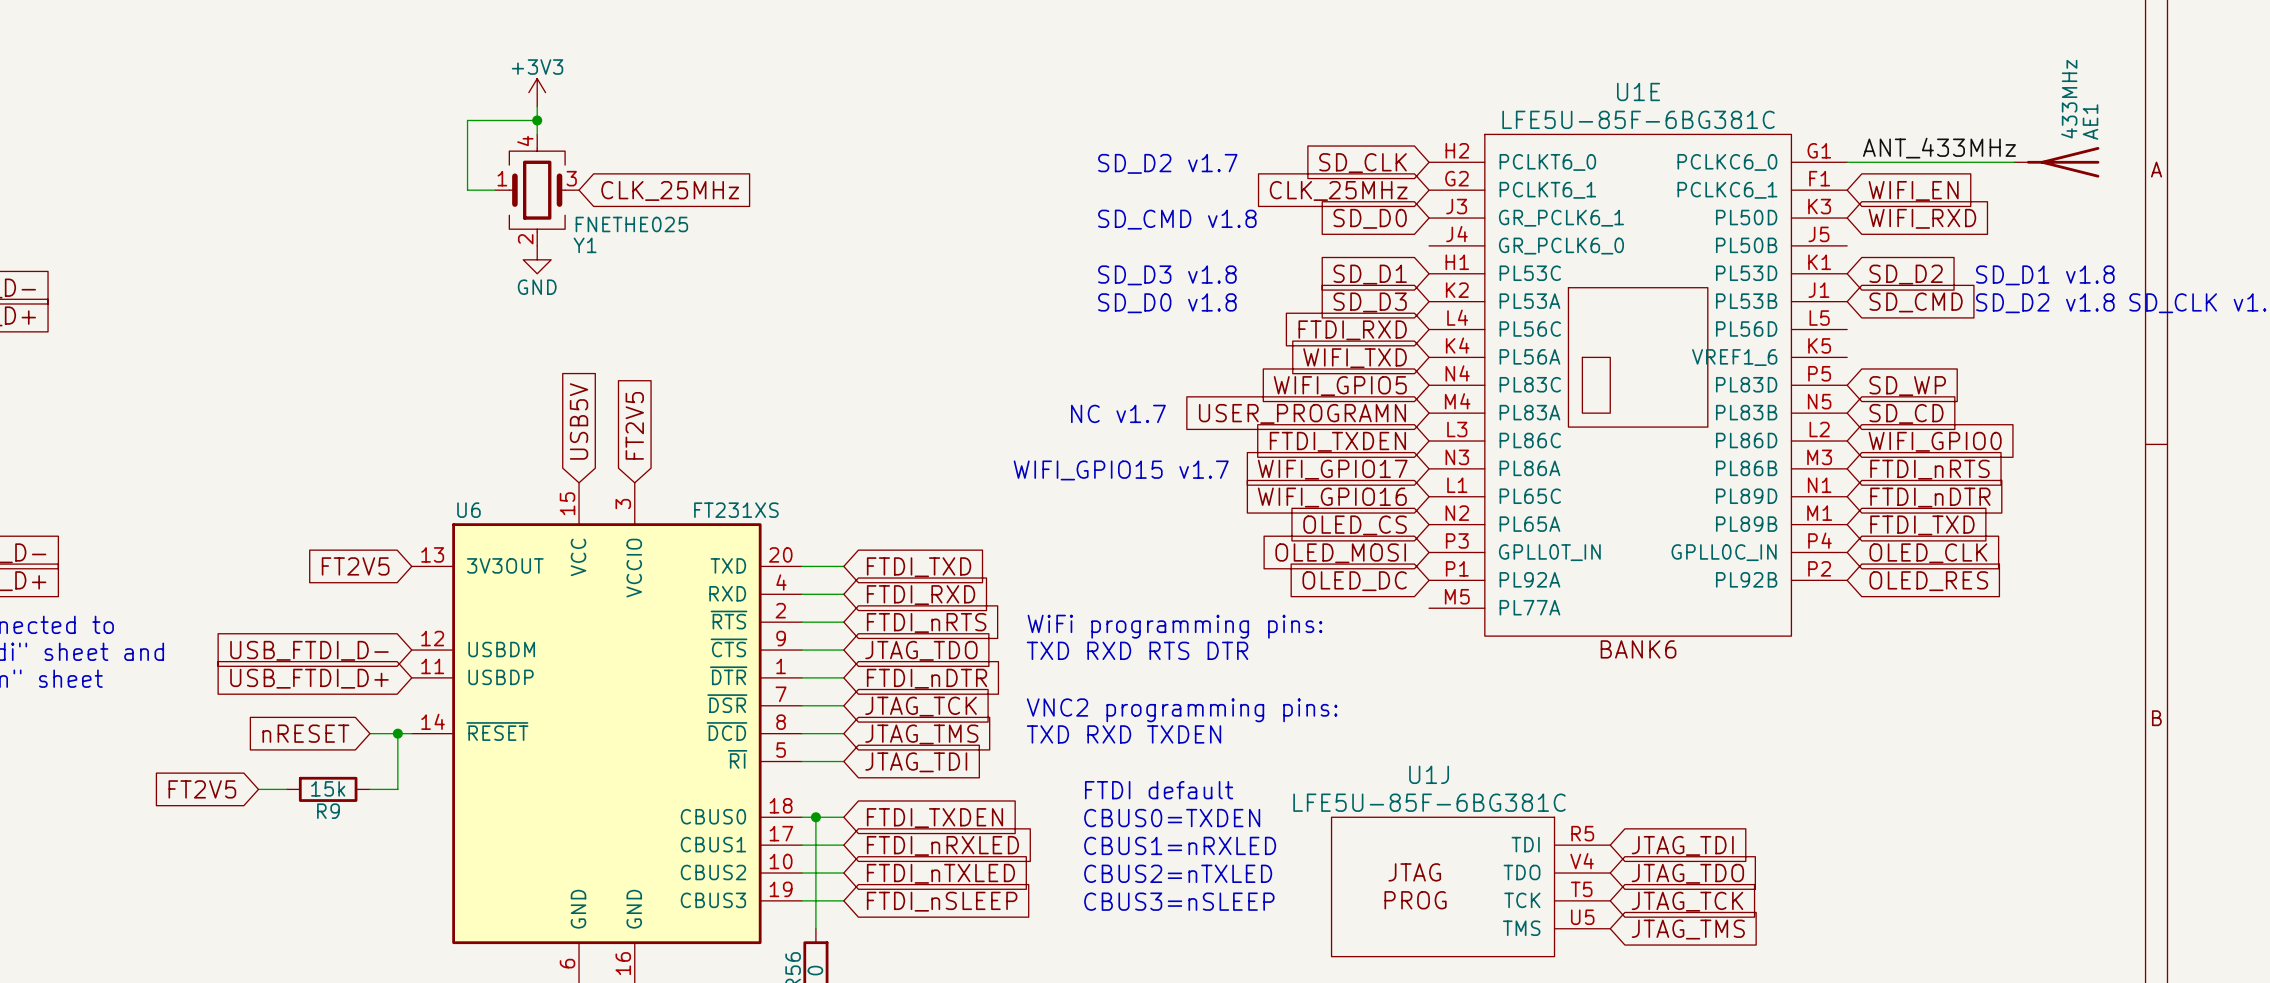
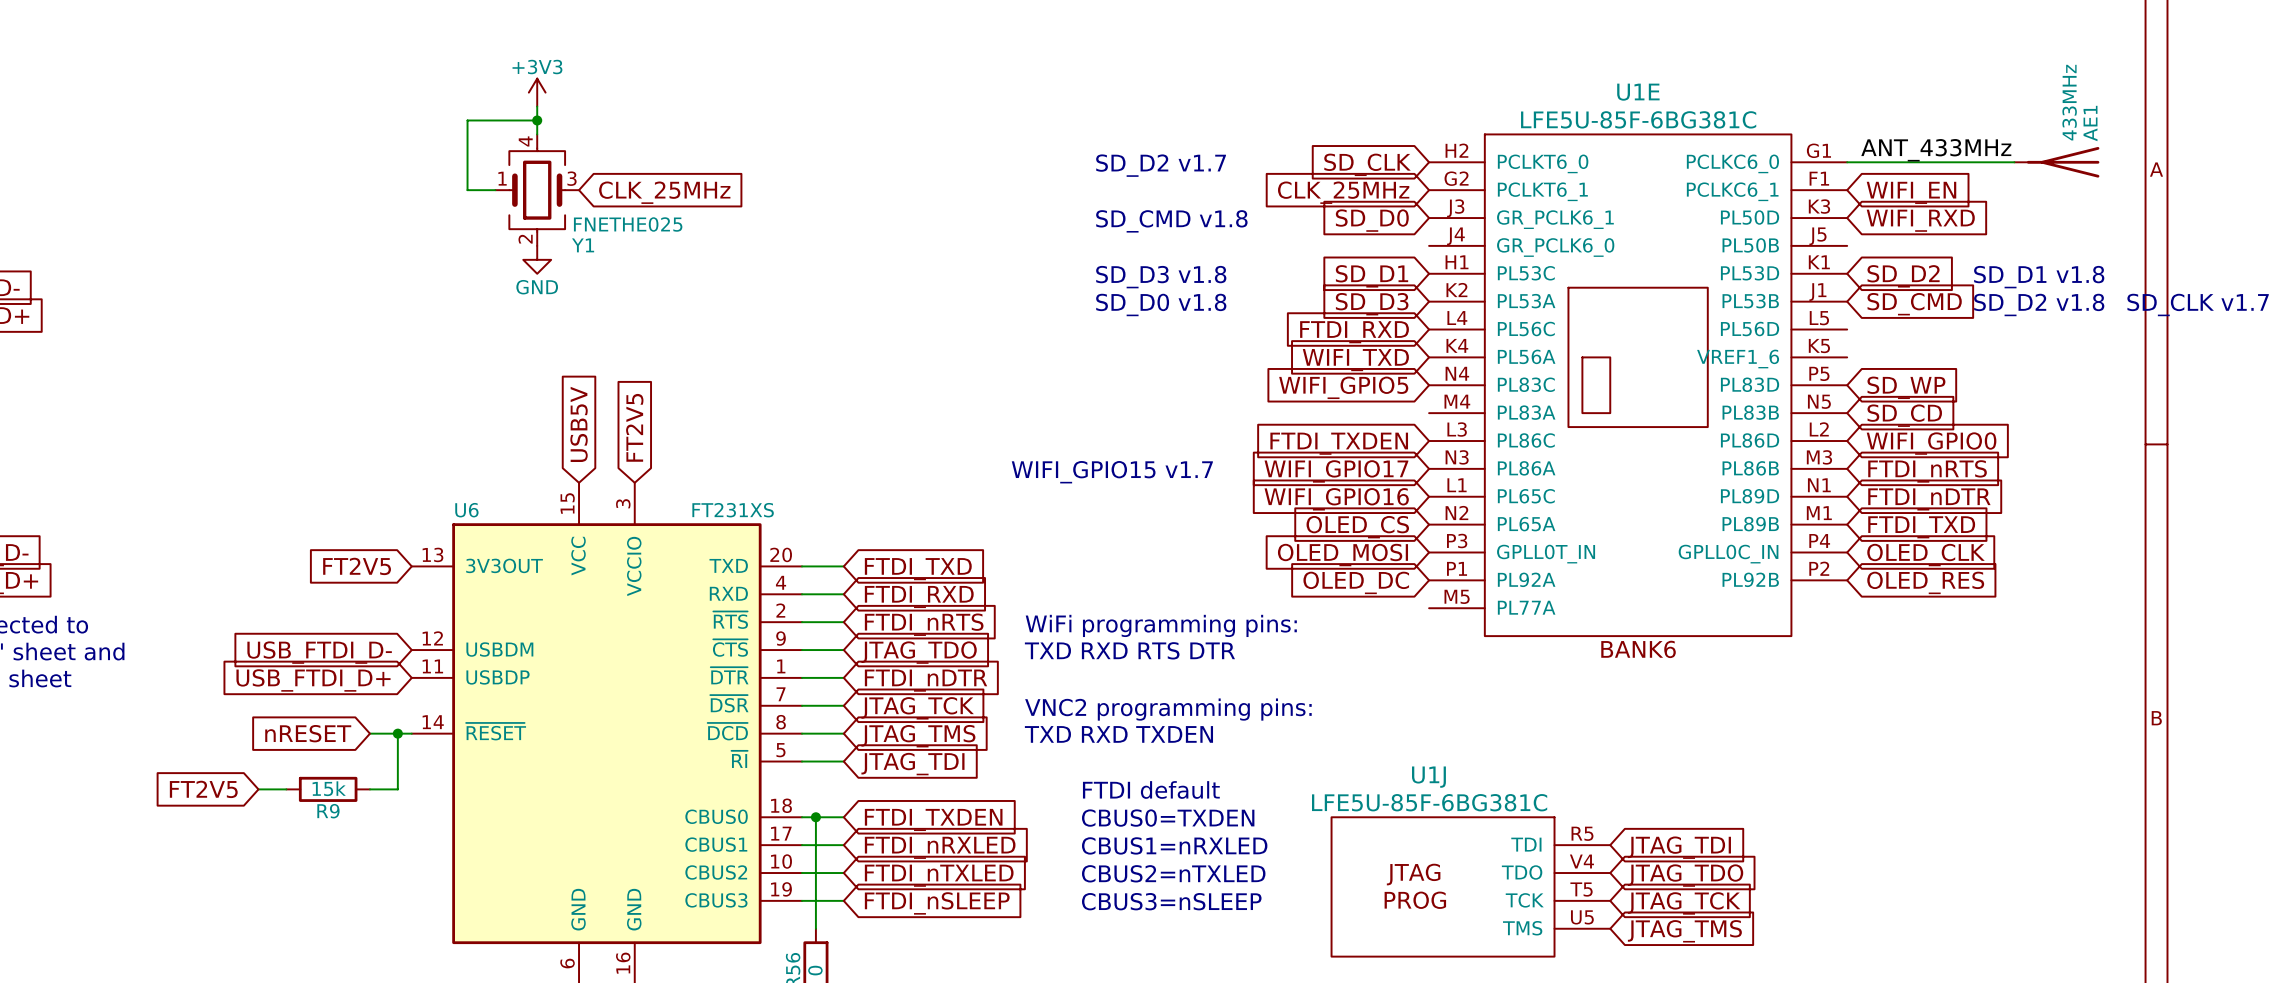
text: NC v1.7 (1118, 413) -> none
global label: USER_PROGRAMN (1302, 413) -> none

